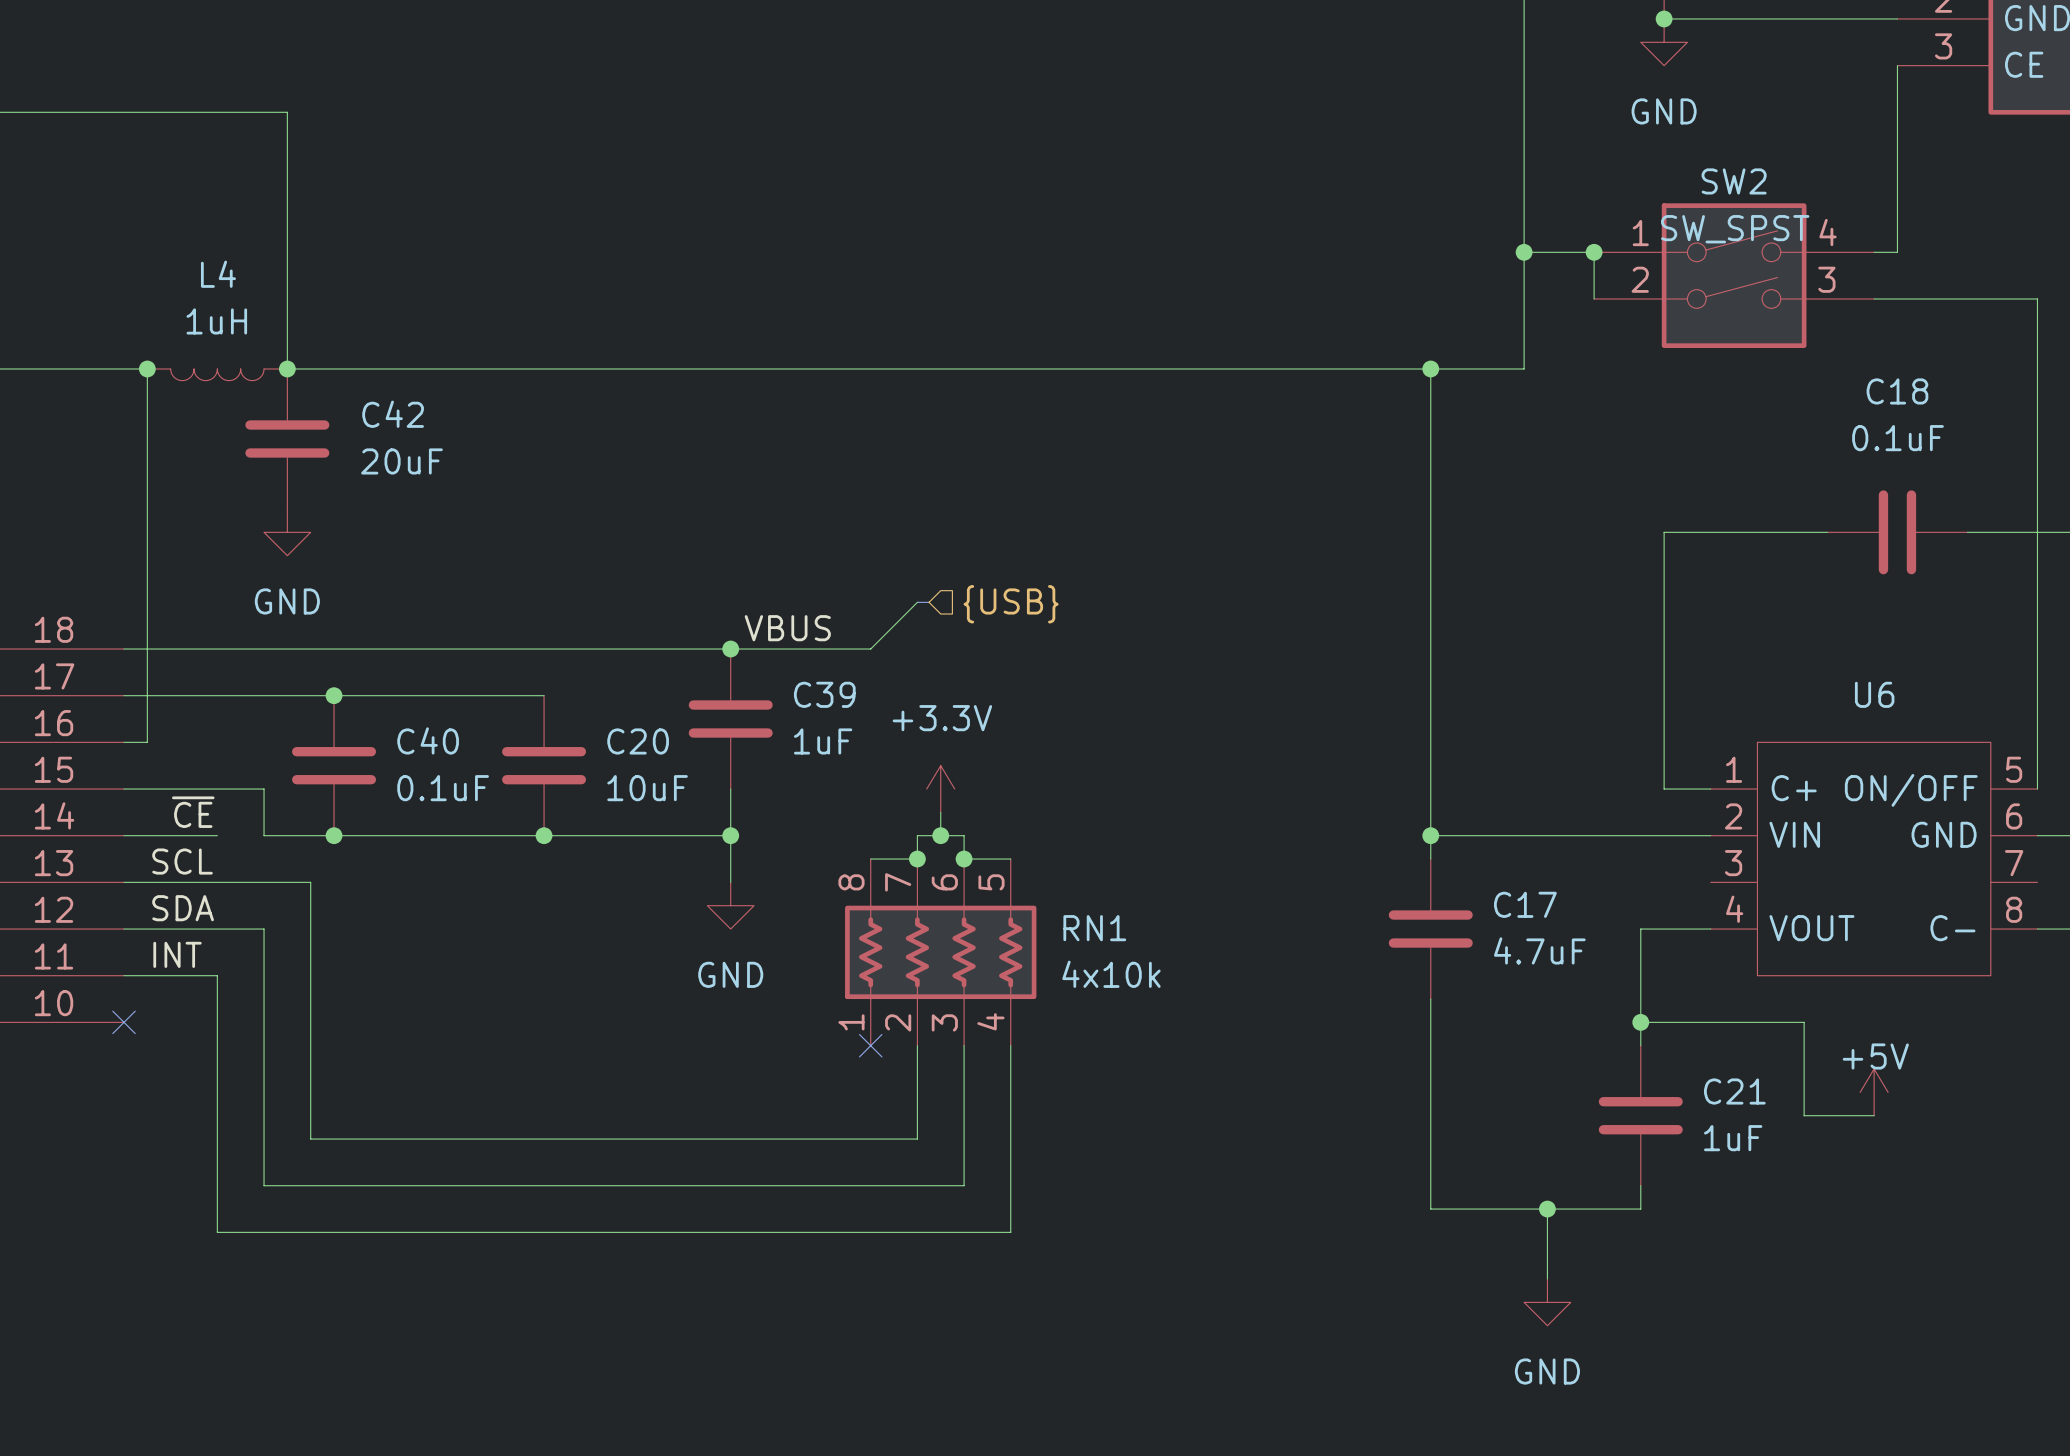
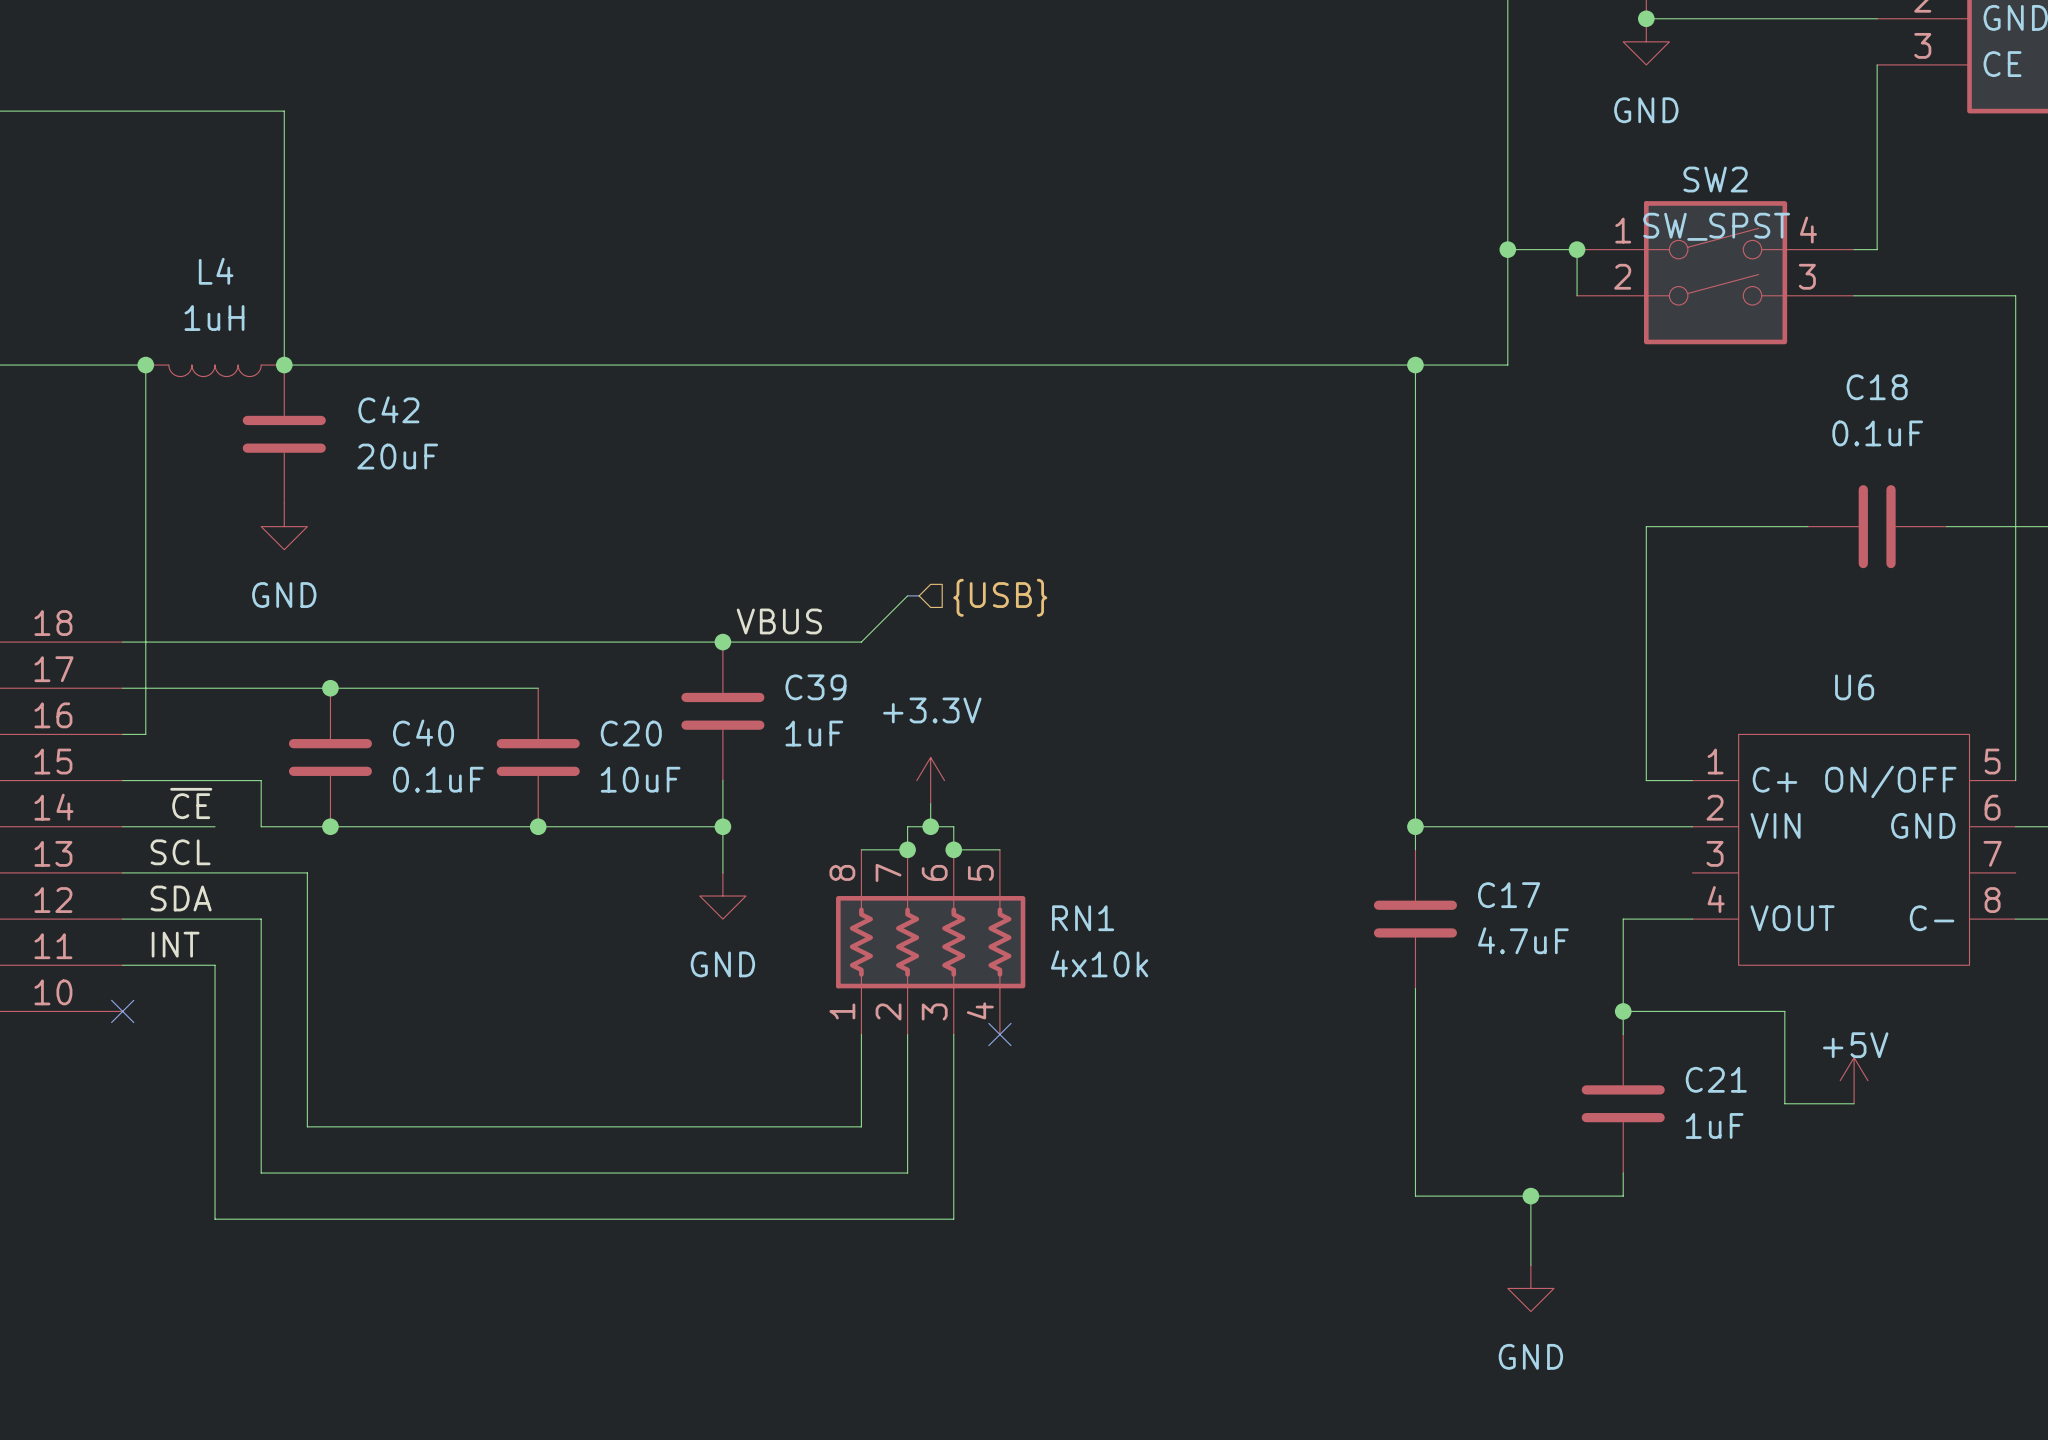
wire: none -> (861, 1034) (861, 1126)
no-connect mark: (870, 1045) -> none
wire: (1010, 1045) (1010, 1232) (964, 1232) -> none
no-connect mark: none -> (999, 1034)
wire: (870, 1139) (917, 1139) -> (907, 1173) (907, 1126)
wire: (917, 1185) (964, 1185) -> (953, 1219) (953, 1173)

